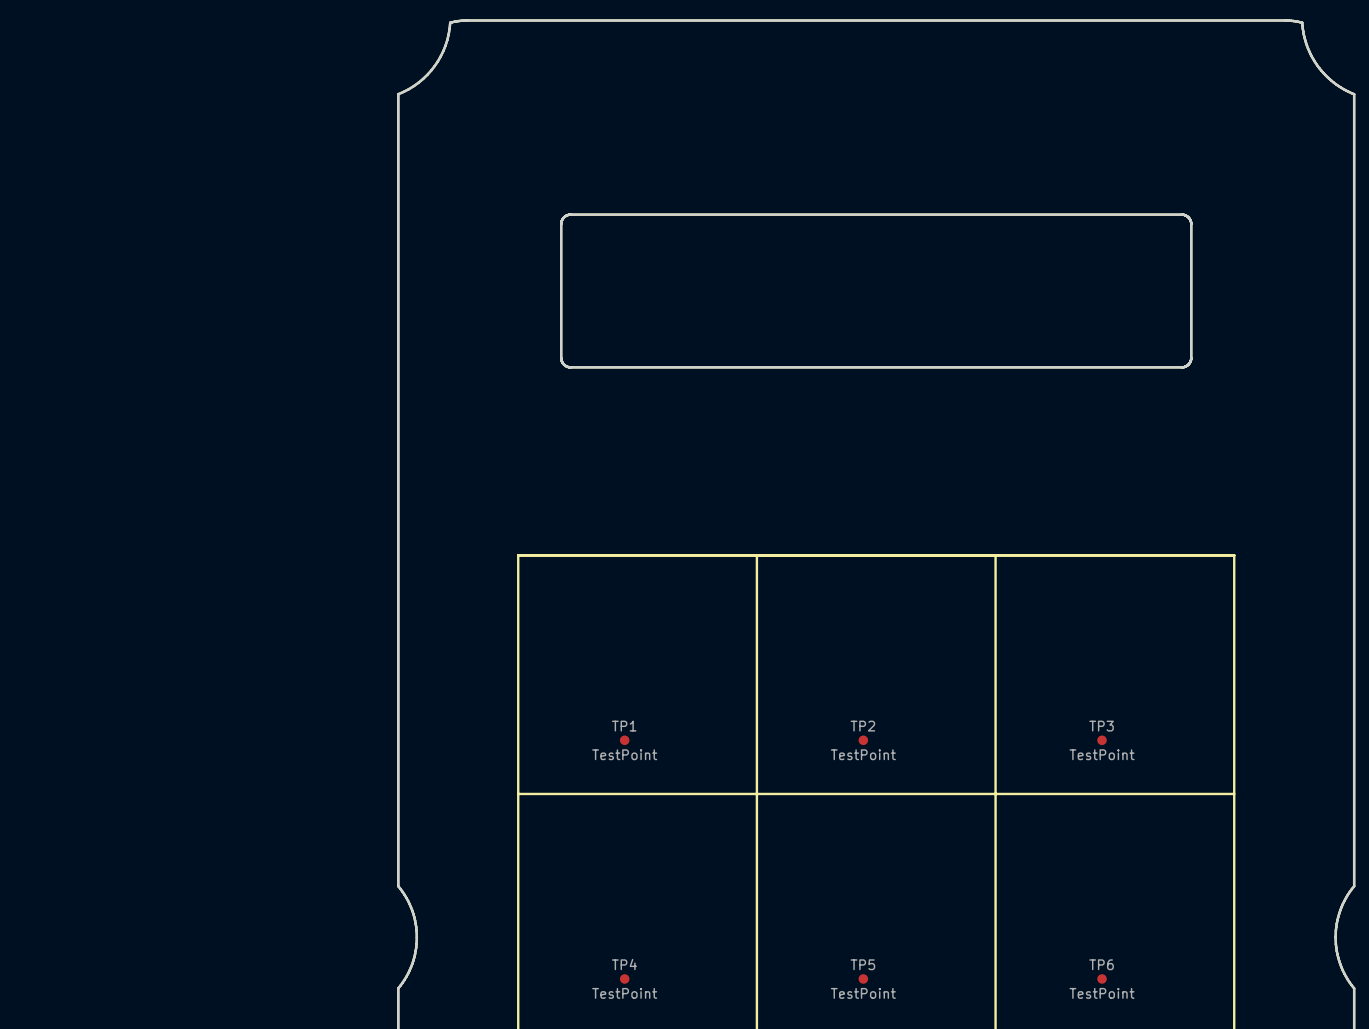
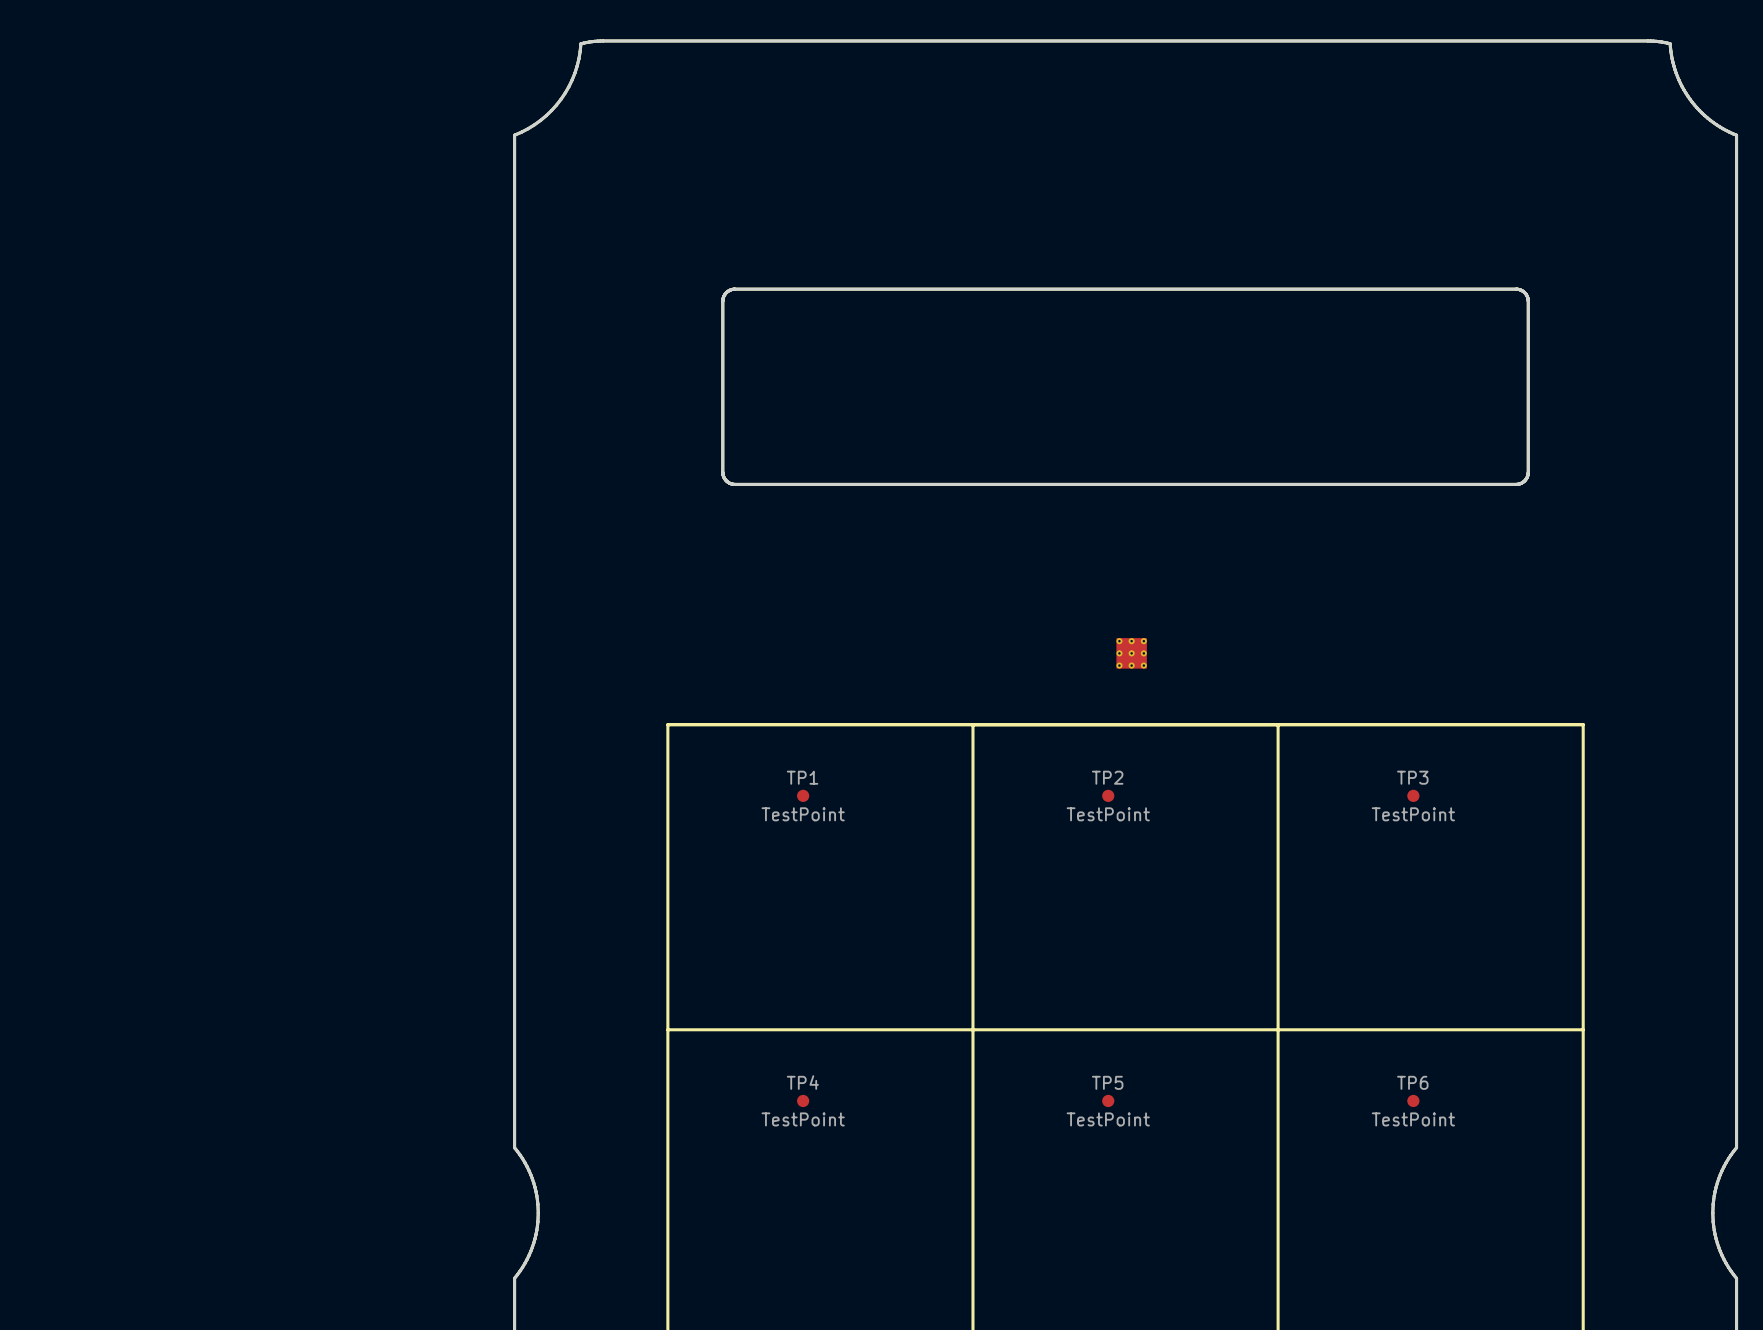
part: none -> (1131, 653)
TP1 position: (624, 740) -> (803, 795)
TP2 position: (863, 740) -> (1108, 795)
TP3 position: (1102, 740) -> (1413, 795)
TP4 position: (624, 978) -> (803, 1100)
TP5 position: (863, 978) -> (1108, 1100)
TP6 position: (1102, 978) -> (1413, 1100)

